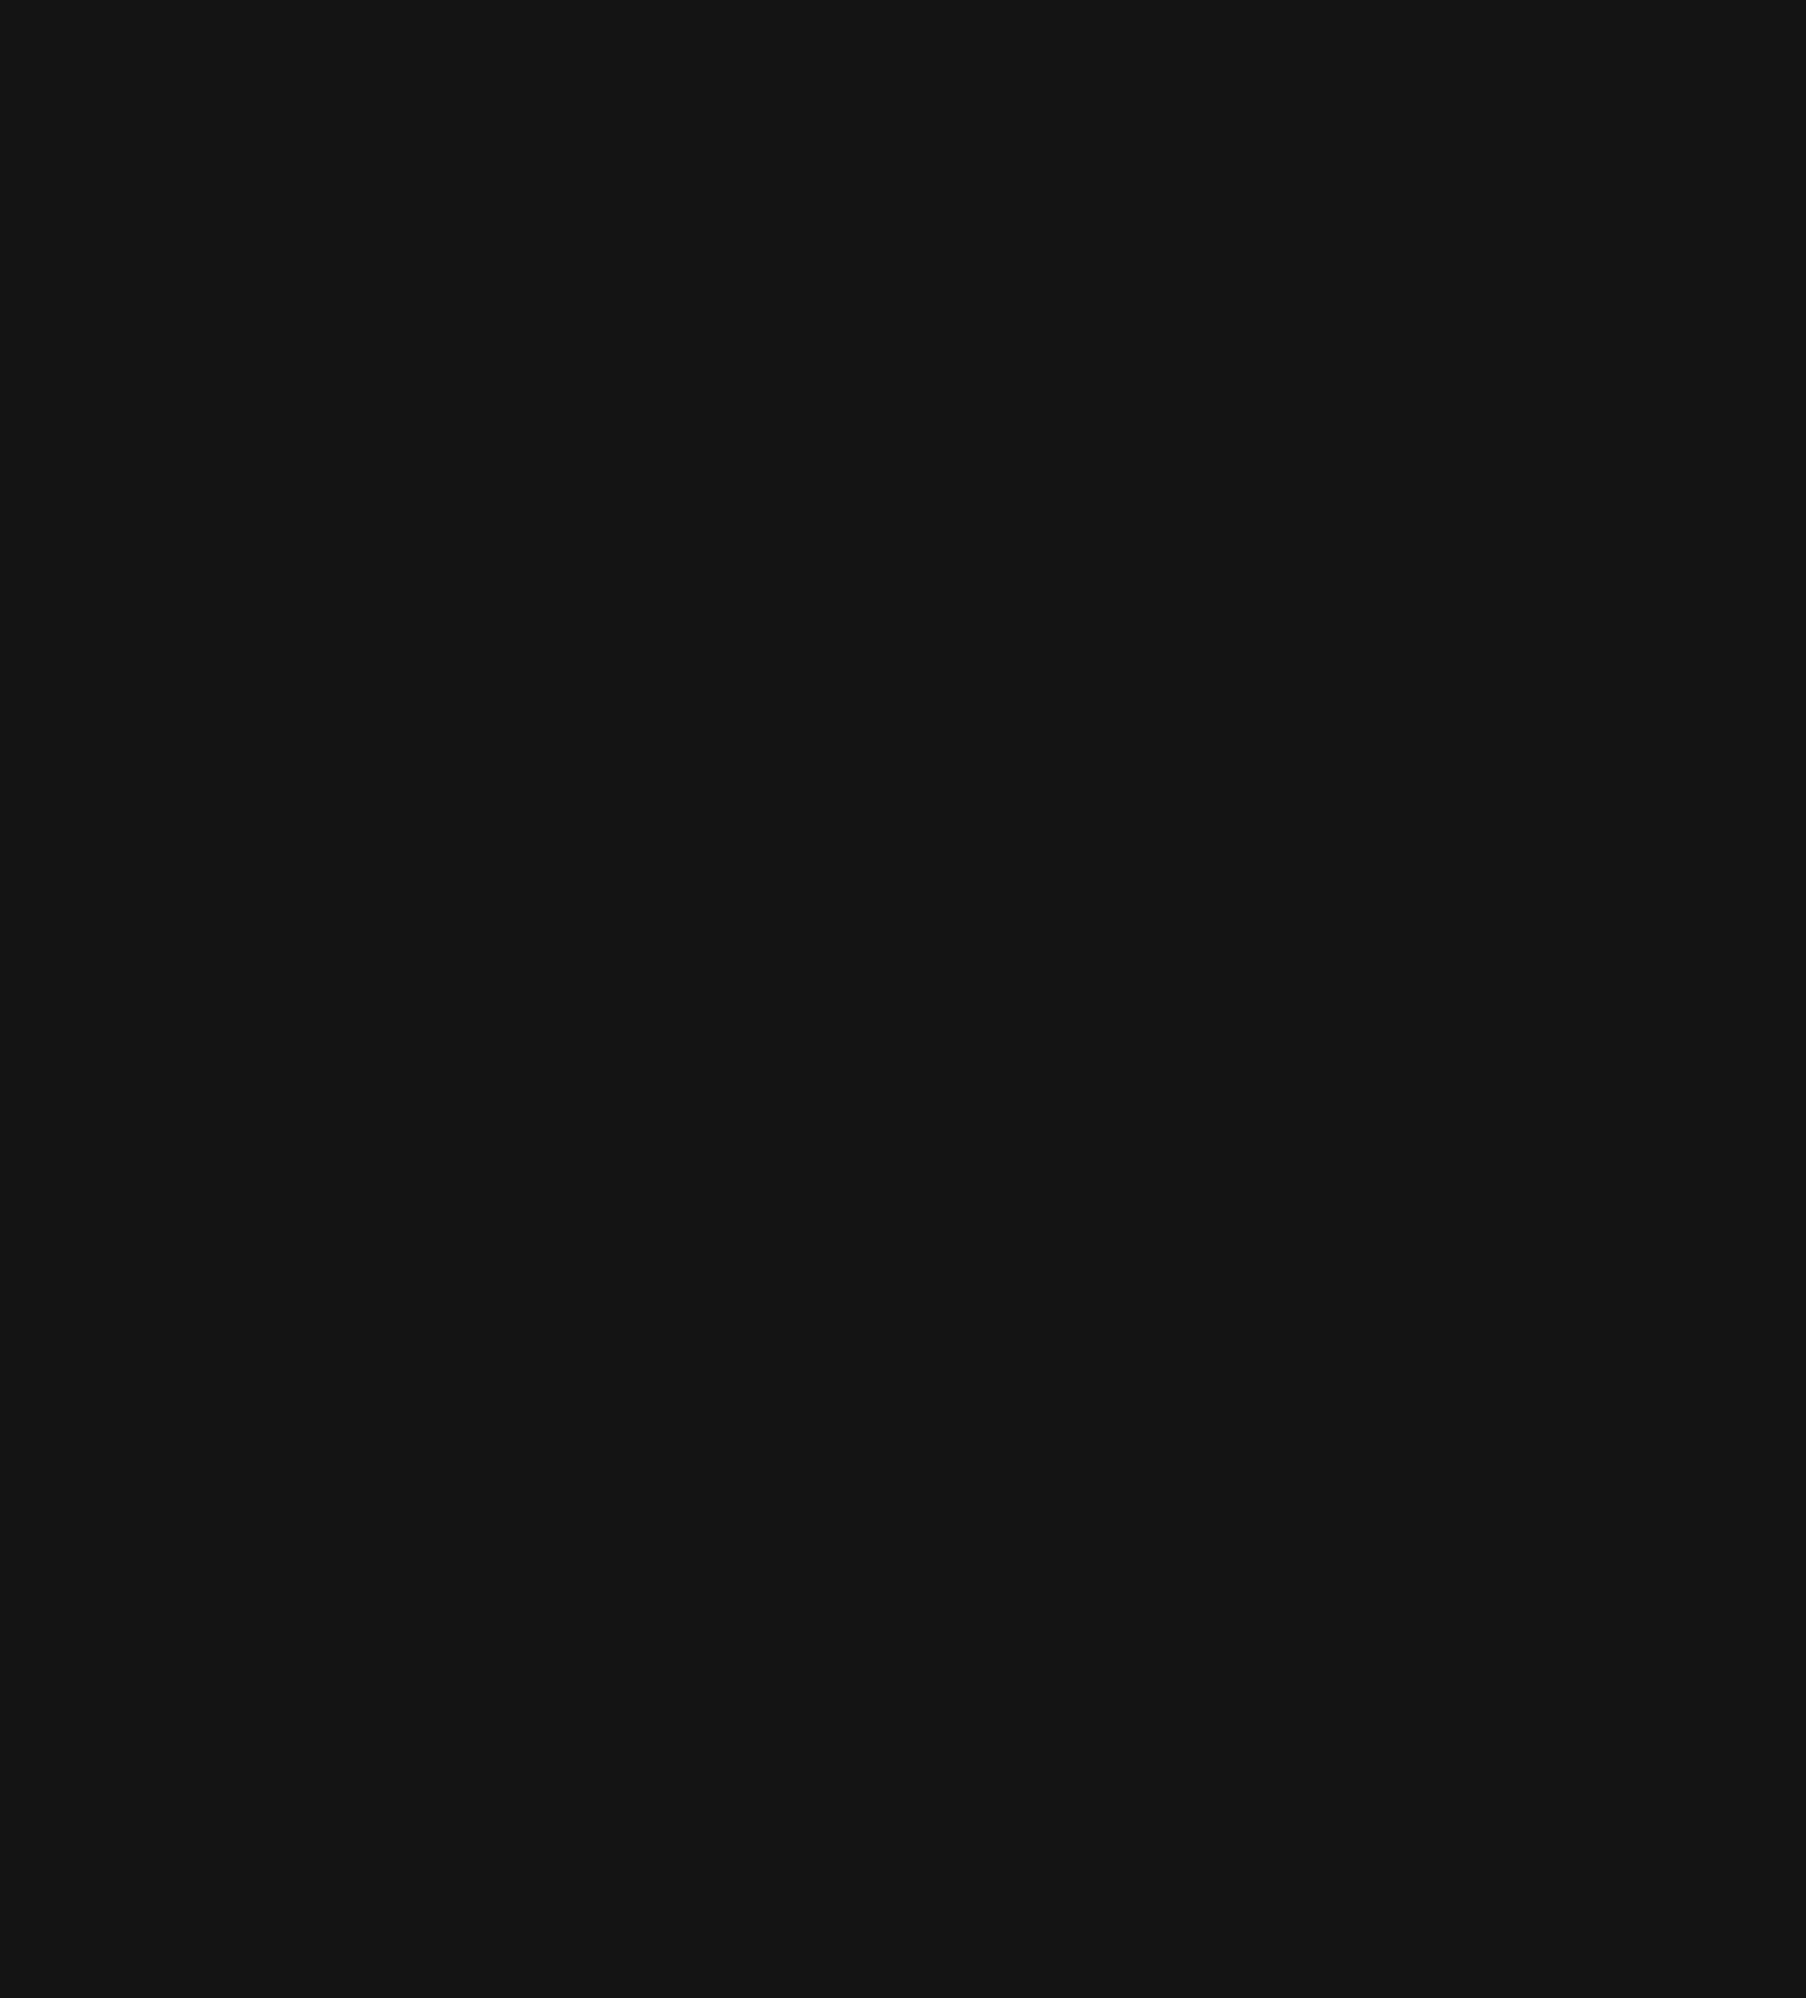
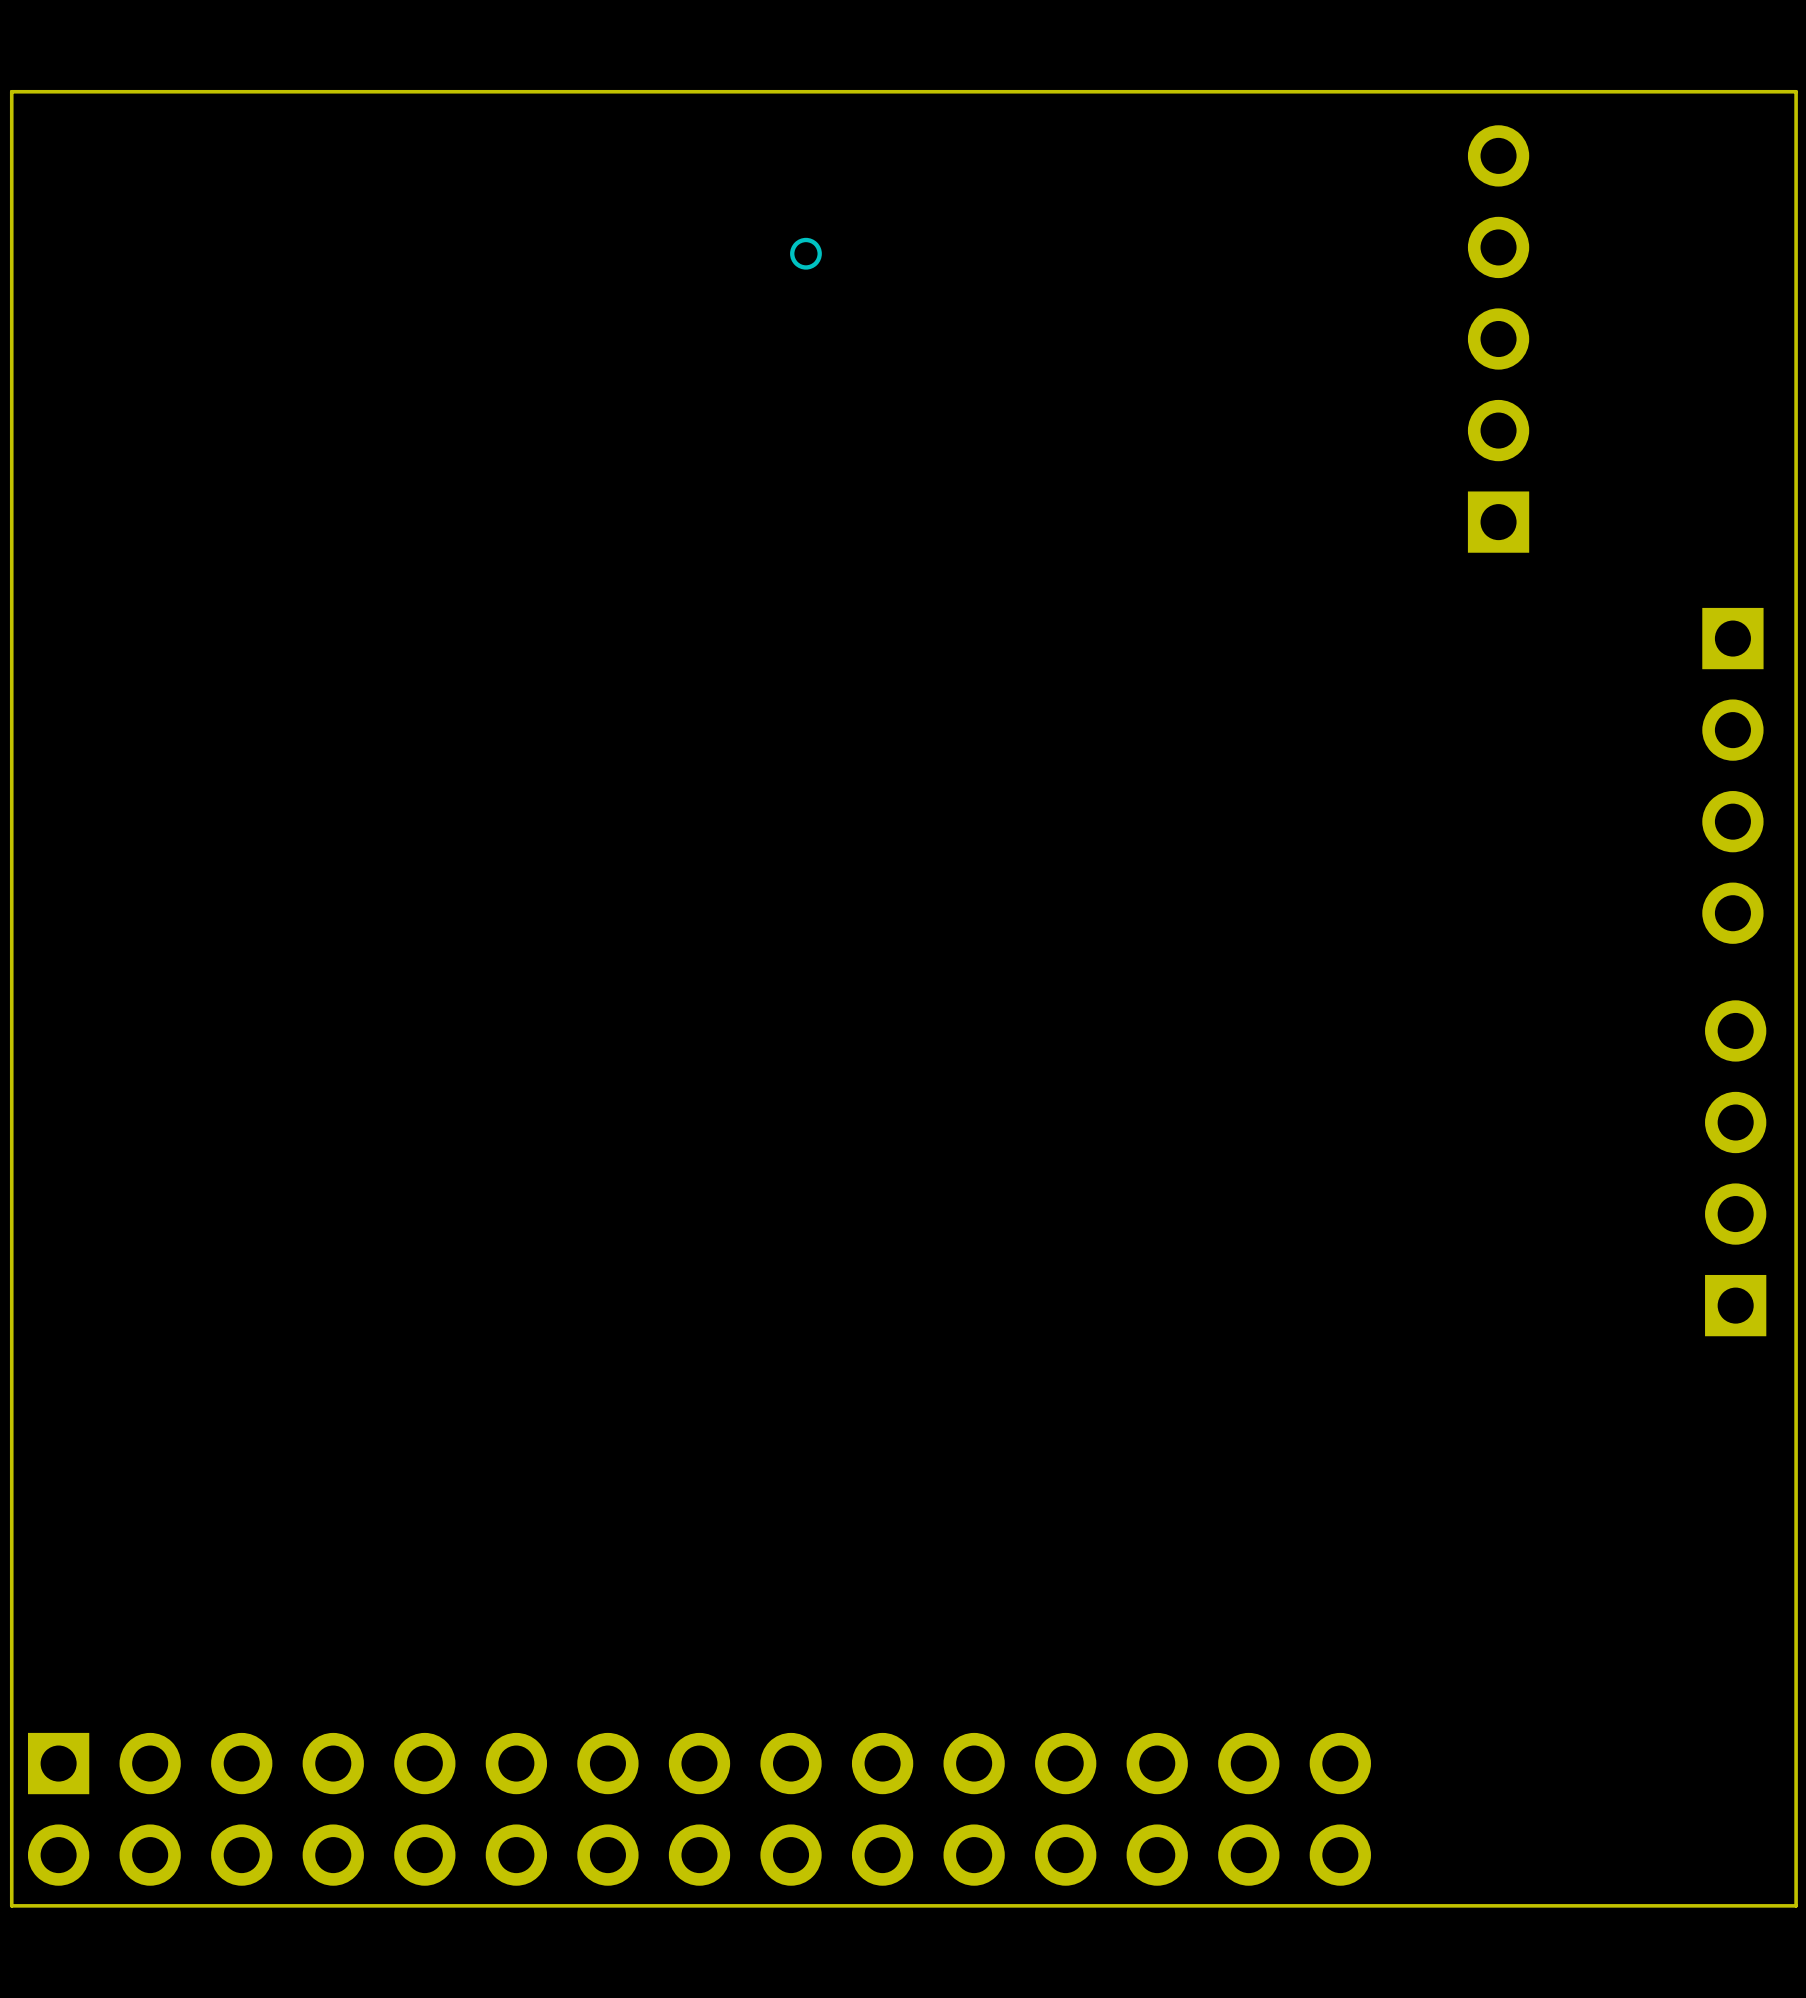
board edge: none -> (1796, 91) (11, 91) (11, 1905) (1796, 1905) (1796, 91)
part: none -> (805, 253)
part: none -> (1498, 339)
part: none -> (1732, 775)
part: none -> (1735, 1168)
part: none -> (699, 1809)

